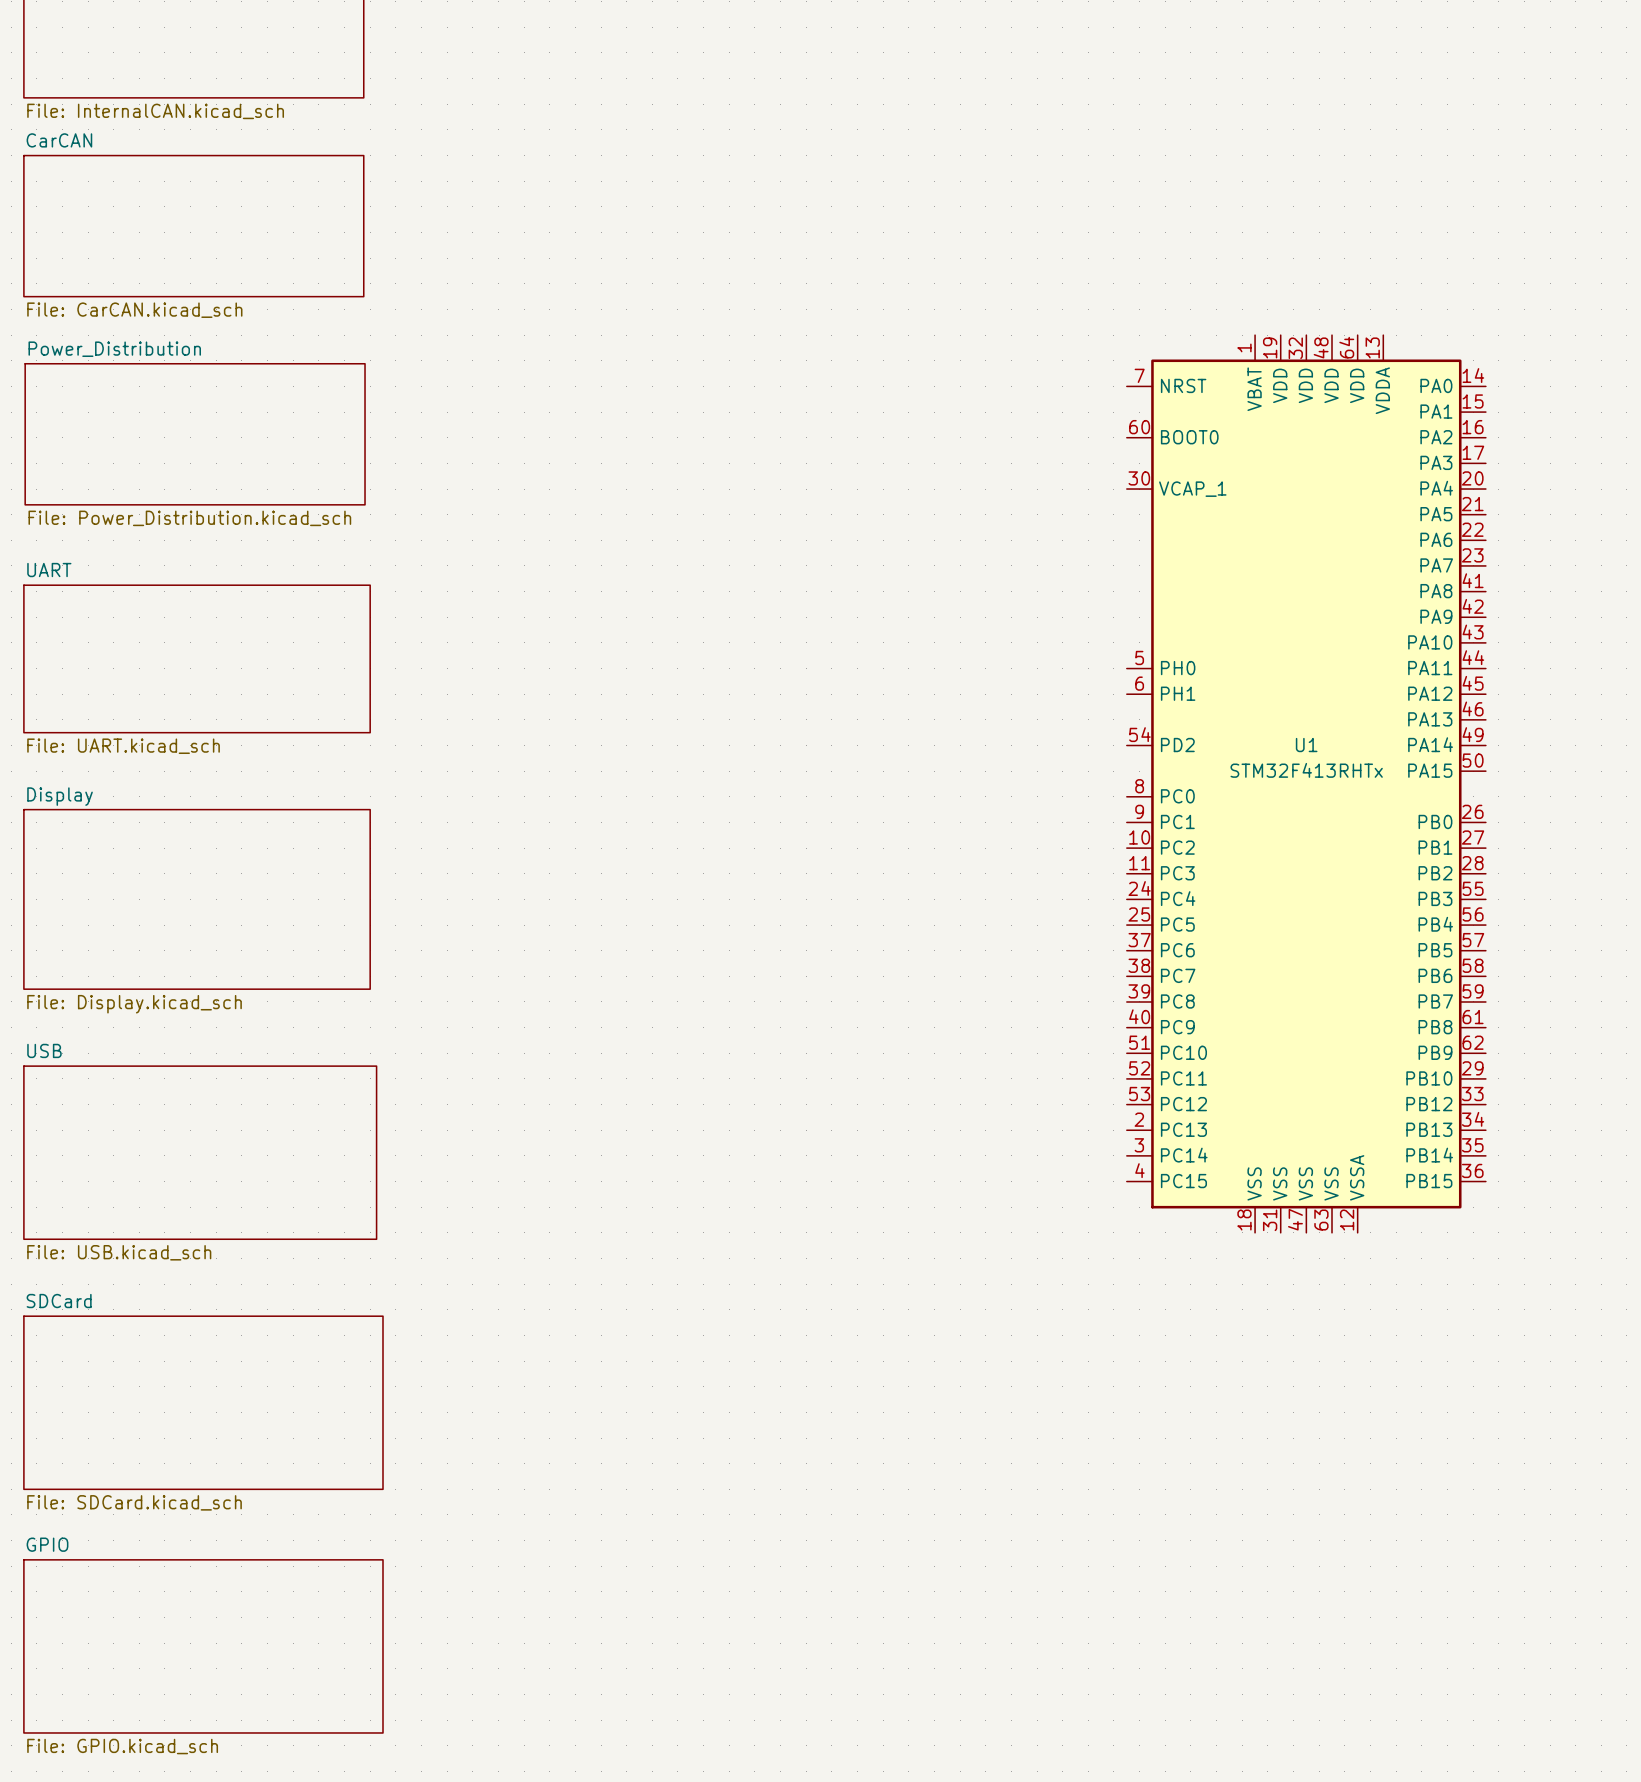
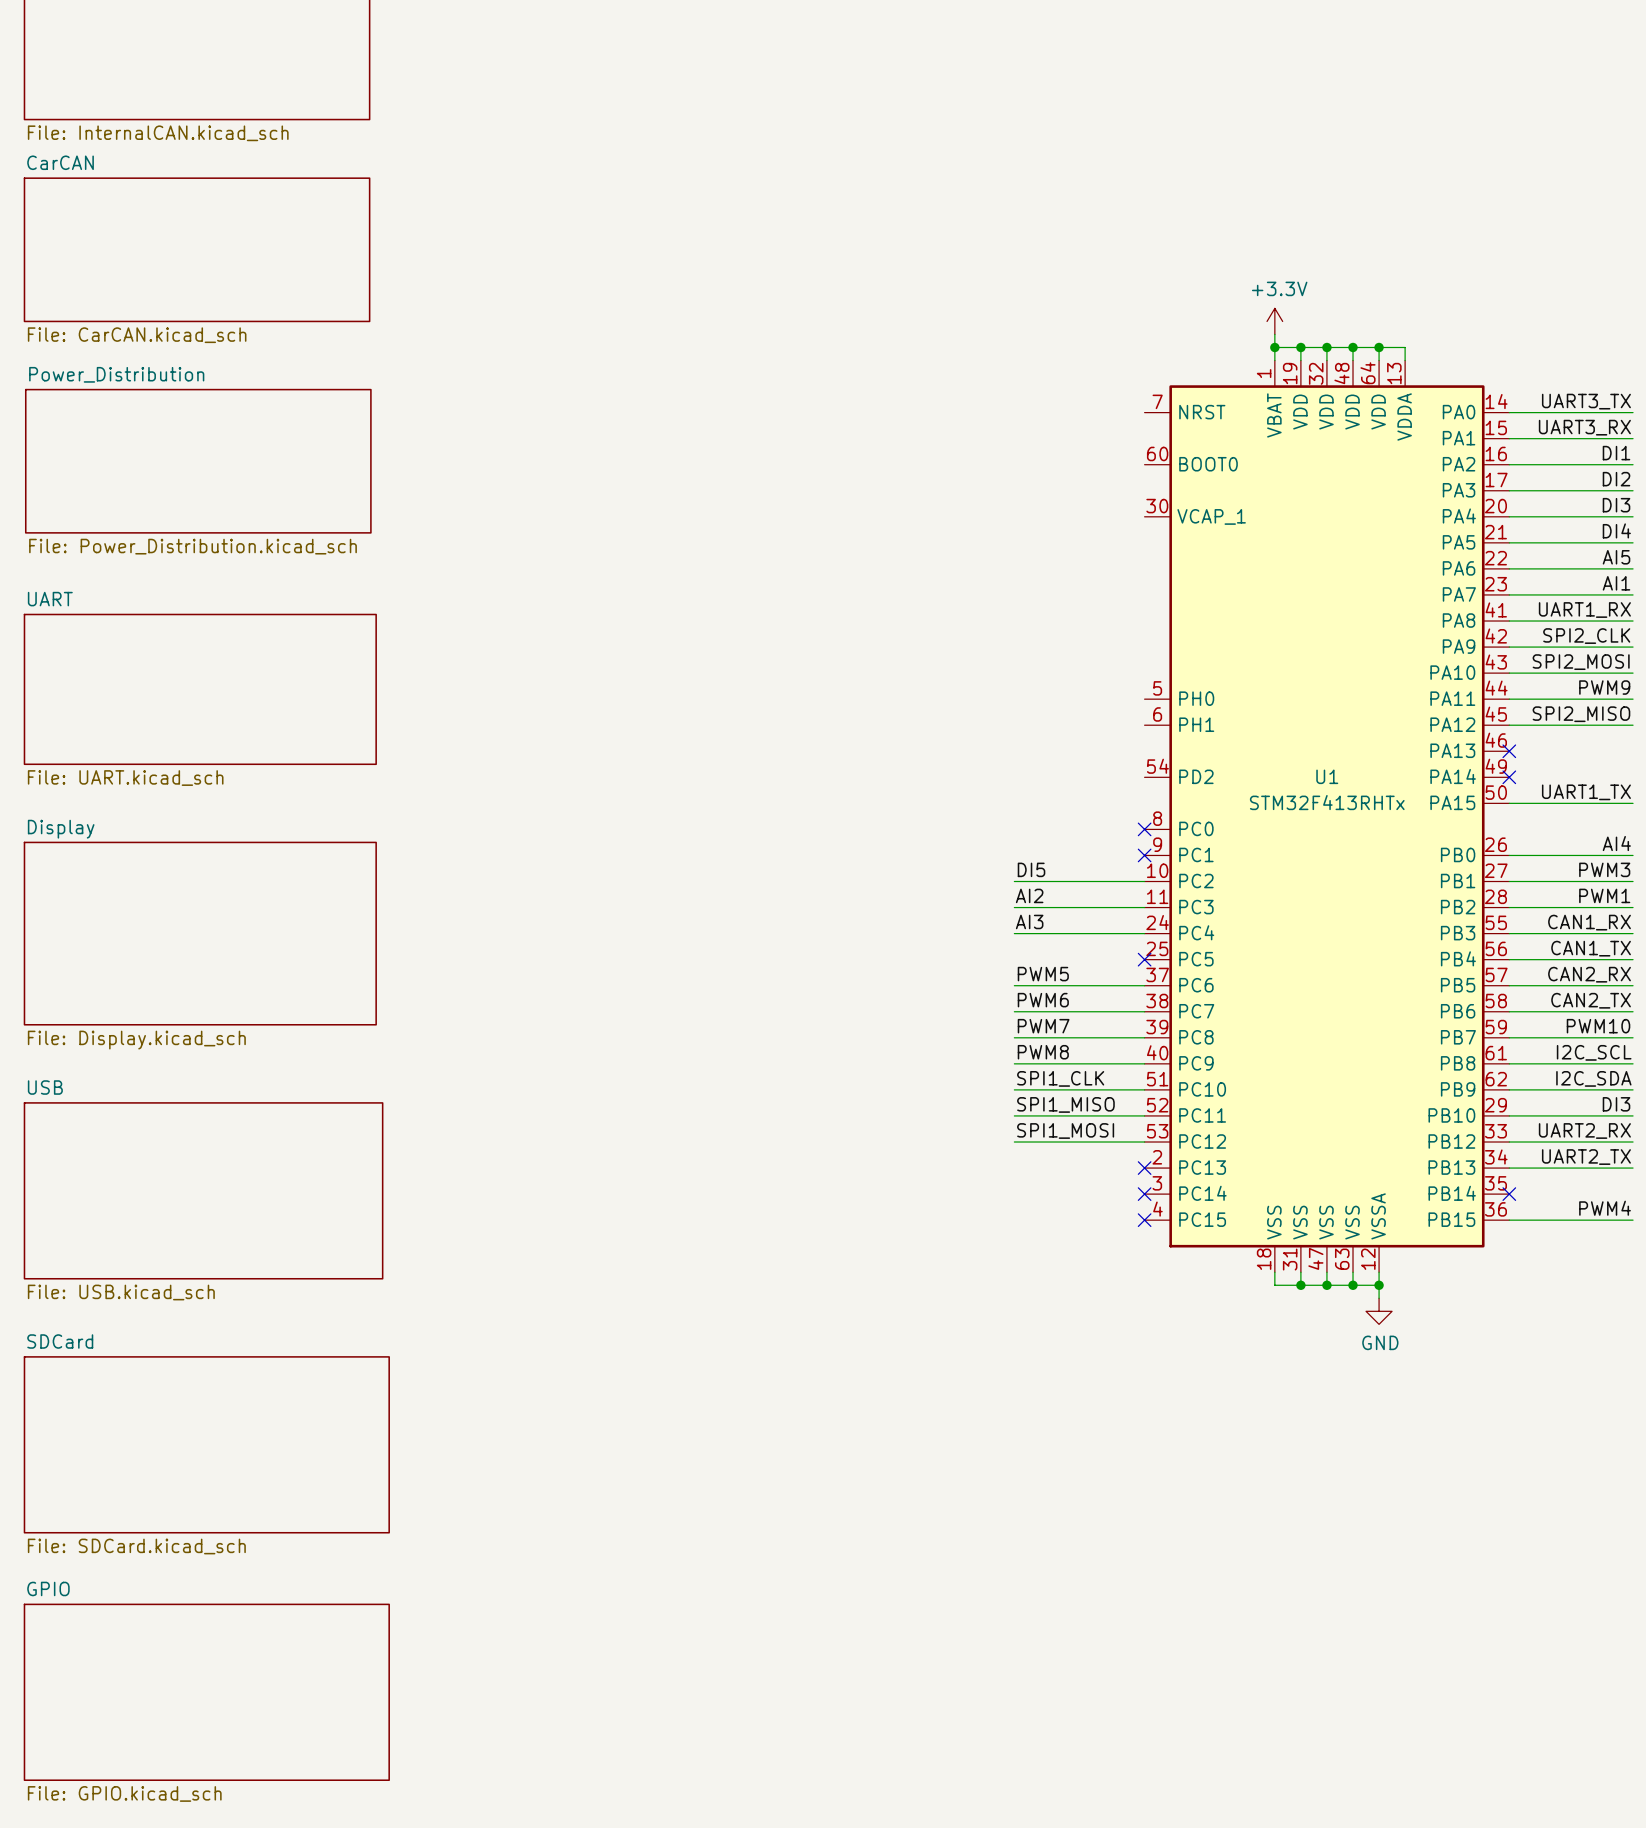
power symbol: none -> +3.3V (1274, 321)
wire: none -> (1274, 334) (1274, 360)
wire: none -> (1274, 347) (1405, 347) (1405, 360)
junction: none -> (1274, 347)
wire: none -> (1300, 347) (1300, 360)
junction: none -> (1300, 347)
wire: none -> (1326, 347) (1326, 360)
junction: none -> (1326, 347)
wire: none -> (1353, 347) (1353, 360)
junction: none -> (1353, 347)
wire: none -> (1379, 347) (1379, 360)
junction: none -> (1379, 347)
label: none -> UART3_TX (1586, 401)
wire: none -> (1509, 412) (1633, 412)
label: none -> UART3_RX (1584, 427)
wire: none -> (1509, 438) (1633, 438)
label: none -> DI1 (1616, 453)
wire: none -> (1509, 464) (1633, 464)
label: none -> DI2 (1616, 479)
wire: none -> (1509, 490) (1633, 490)
label: none -> DI3 (1616, 505)
wire: none -> (1509, 516) (1633, 516)
label: none -> DI4 (1616, 530)
wire: none -> (1509, 542) (1633, 542)
label: none -> AI5 (1616, 557)
wire: none -> (1509, 568) (1633, 568)
label: none -> AI1 (1616, 583)
wire: none -> (1509, 594) (1633, 594)
label: none -> UART1_RX (1584, 610)
wire: none -> (1509, 621) (1633, 621)
label: none -> SPI2_CLK (1586, 636)
wire: none -> (1509, 647) (1633, 647)
label: none -> SPI2_MOSI (1581, 662)
wire: none -> (1509, 673) (1633, 673)
label: none -> PWM9 (1604, 687)
wire: none -> (1509, 699) (1633, 699)
label: none -> SPI2_MISO (1581, 714)
wire: none -> (1509, 725) (1633, 725)
no-connect mark: none -> (1509, 751)
no-connect mark: none -> (1509, 777)
label: none -> UART1_TX (1586, 792)
wire: none -> (1509, 803) (1633, 803)
no-connect mark: none -> (1144, 829)
label: none -> AI4 (1616, 843)
no-connect mark: none -> (1144, 855)
wire: none -> (1509, 855) (1633, 855)
label: none -> DI5 (1031, 869)
label: none -> PWM3 (1604, 869)
wire: none -> (1014, 881) (1144, 881)
wire: none -> (1509, 881) (1633, 881)
label: none -> AI2 (1029, 895)
label: none -> PWM1 (1604, 895)
wire: none -> (1014, 907) (1144, 907)
wire: none -> (1509, 907) (1633, 907)
label: none -> AI3 (1029, 921)
label: none -> CAN1_RX (1589, 922)
wire: none -> (1014, 933) (1144, 933)
wire: none -> (1509, 933) (1633, 933)
label: none -> CAN1_TX (1591, 948)
no-connect mark: none -> (1144, 959)
wire: none -> (1509, 959) (1633, 959)
label: none -> PWM5 (1043, 974)
label: none -> CAN2_RX (1589, 974)
wire: none -> (1014, 985) (1144, 985)
wire: none -> (1509, 985) (1633, 985)
label: none -> PWM6 (1043, 1000)
label: none -> CAN2_TX (1591, 1000)
wire: none -> (1014, 1011) (1144, 1011)
wire: none -> (1509, 1011) (1633, 1011)
label: none -> PWM7 (1043, 1026)
label: none -> PWM10 (1598, 1026)
wire: none -> (1014, 1037) (1144, 1037)
wire: none -> (1509, 1037) (1633, 1037)
label: none -> PWM8 (1043, 1052)
label: none -> I2C_SCL (1594, 1052)
wire: none -> (1014, 1063) (1144, 1063)
wire: none -> (1509, 1063) (1633, 1063)
label: none -> SPI1_CLK (1060, 1078)
label: none -> I2C_SDA (1593, 1078)
wire: none -> (1014, 1089) (1144, 1089)
wire: none -> (1509, 1089) (1633, 1089)
label: none -> DI3 (1616, 1104)
label: none -> SPI1_MISO (1065, 1104)
wire: none -> (1014, 1115) (1144, 1115)
wire: none -> (1509, 1115) (1633, 1115)
label: none -> SPI1_MOSI (1065, 1131)
label: none -> UART2_RX (1584, 1131)
wire: none -> (1014, 1142) (1144, 1142)
wire: none -> (1509, 1142) (1633, 1142)
label: none -> UART2_TX (1586, 1157)
no-connect mark: none -> (1144, 1168)
wire: none -> (1509, 1168) (1633, 1168)
no-connect mark: none -> (1144, 1194)
no-connect mark: none -> (1509, 1194)
label: none -> PWM4 (1605, 1208)
no-connect mark: none -> (1144, 1220)
wire: none -> (1509, 1220) (1633, 1220)
wire: none -> (1274, 1272) (1274, 1285) (1379, 1285)
wire: none -> (1300, 1272) (1300, 1285)
wire: none -> (1326, 1272) (1326, 1285)
wire: none -> (1353, 1272) (1353, 1285)
wire: none -> (1379, 1272) (1379, 1298)
junction: none -> (1300, 1285)
junction: none -> (1326, 1285)
junction: none -> (1353, 1285)
junction: none -> (1379, 1285)
power symbol: none -> GND (1379, 1311)

